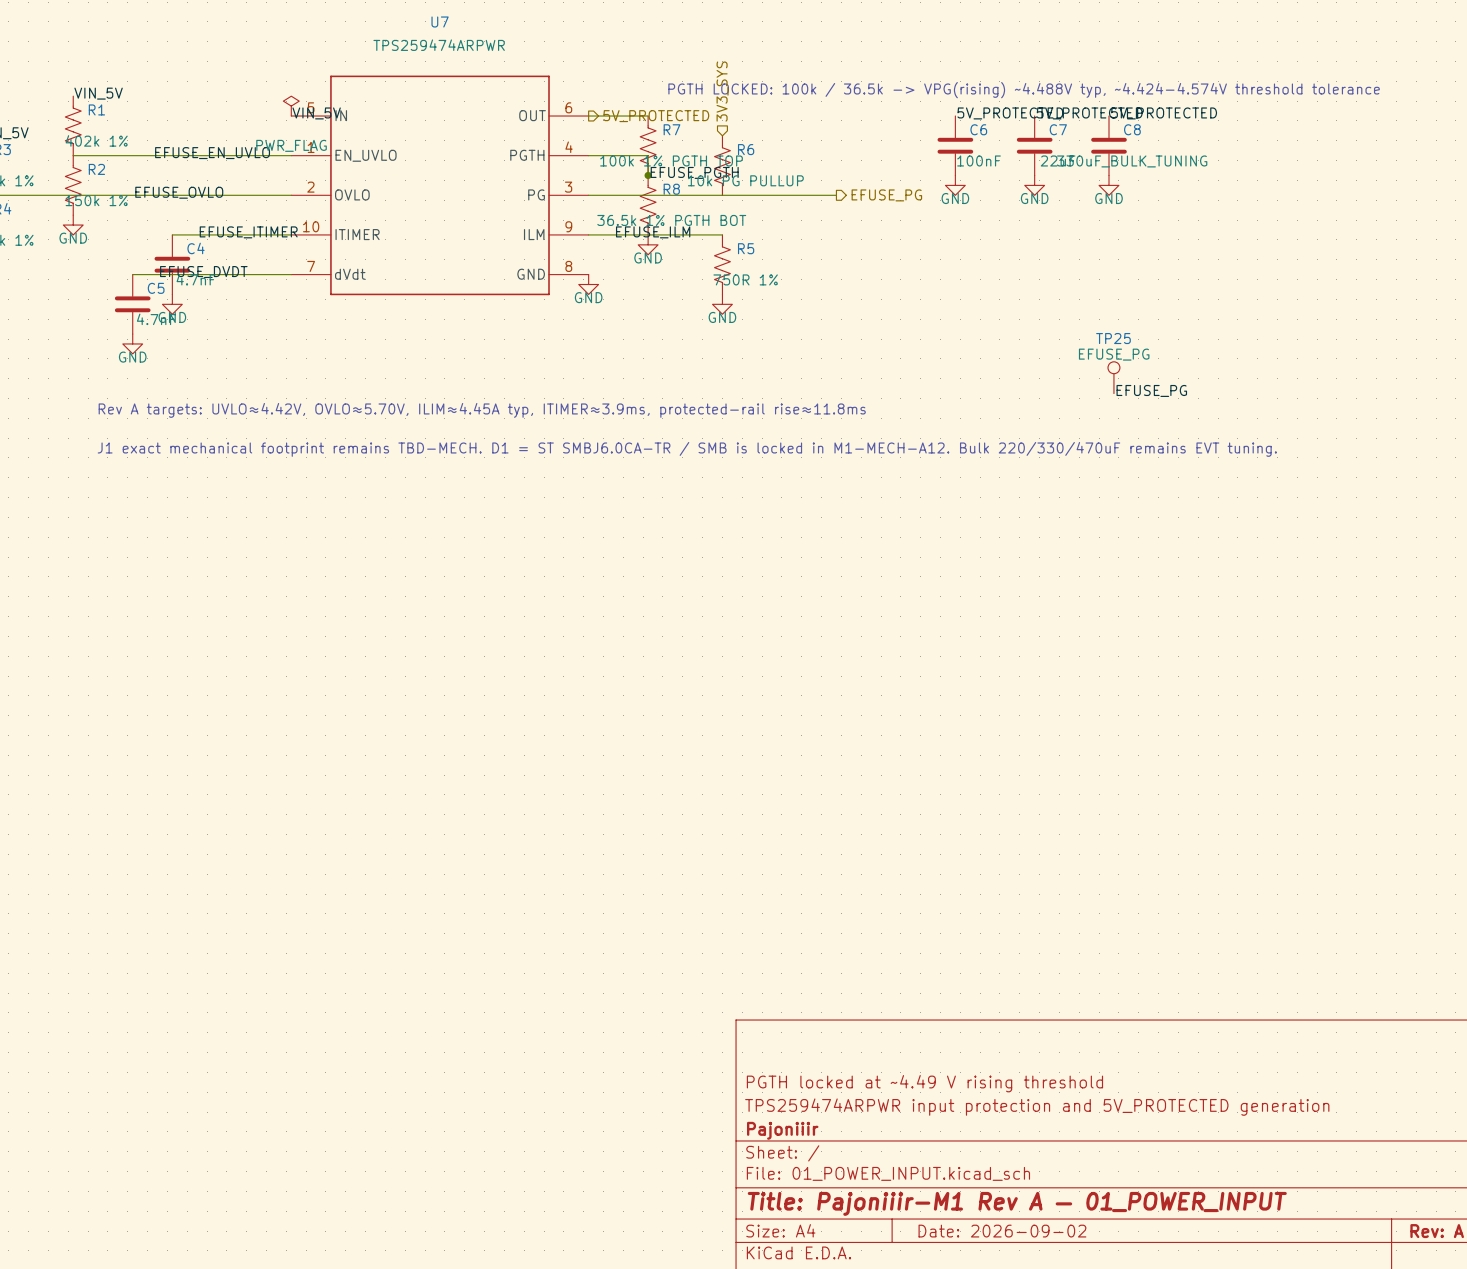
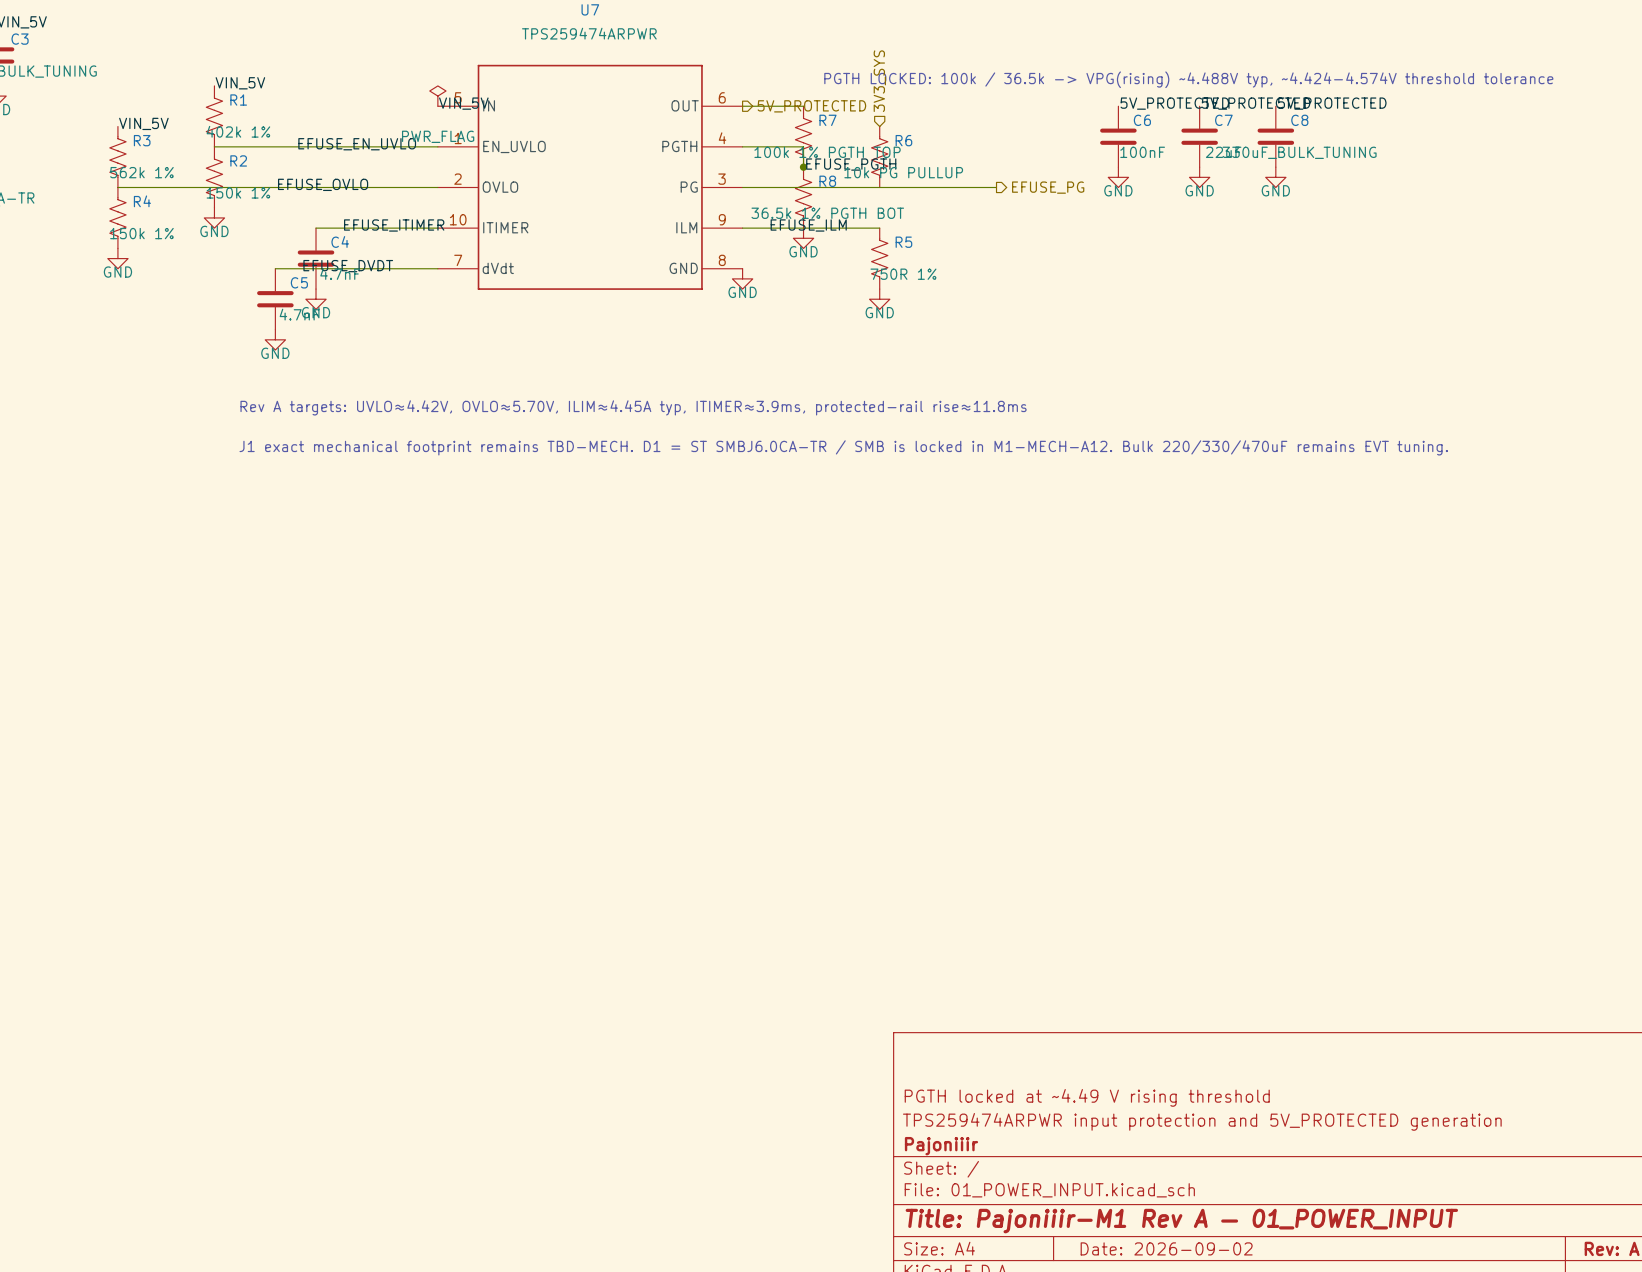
TP25: EFUSE_PG (1113, 377) -> none
label: EFUSE_PG (1151, 390) -> none

